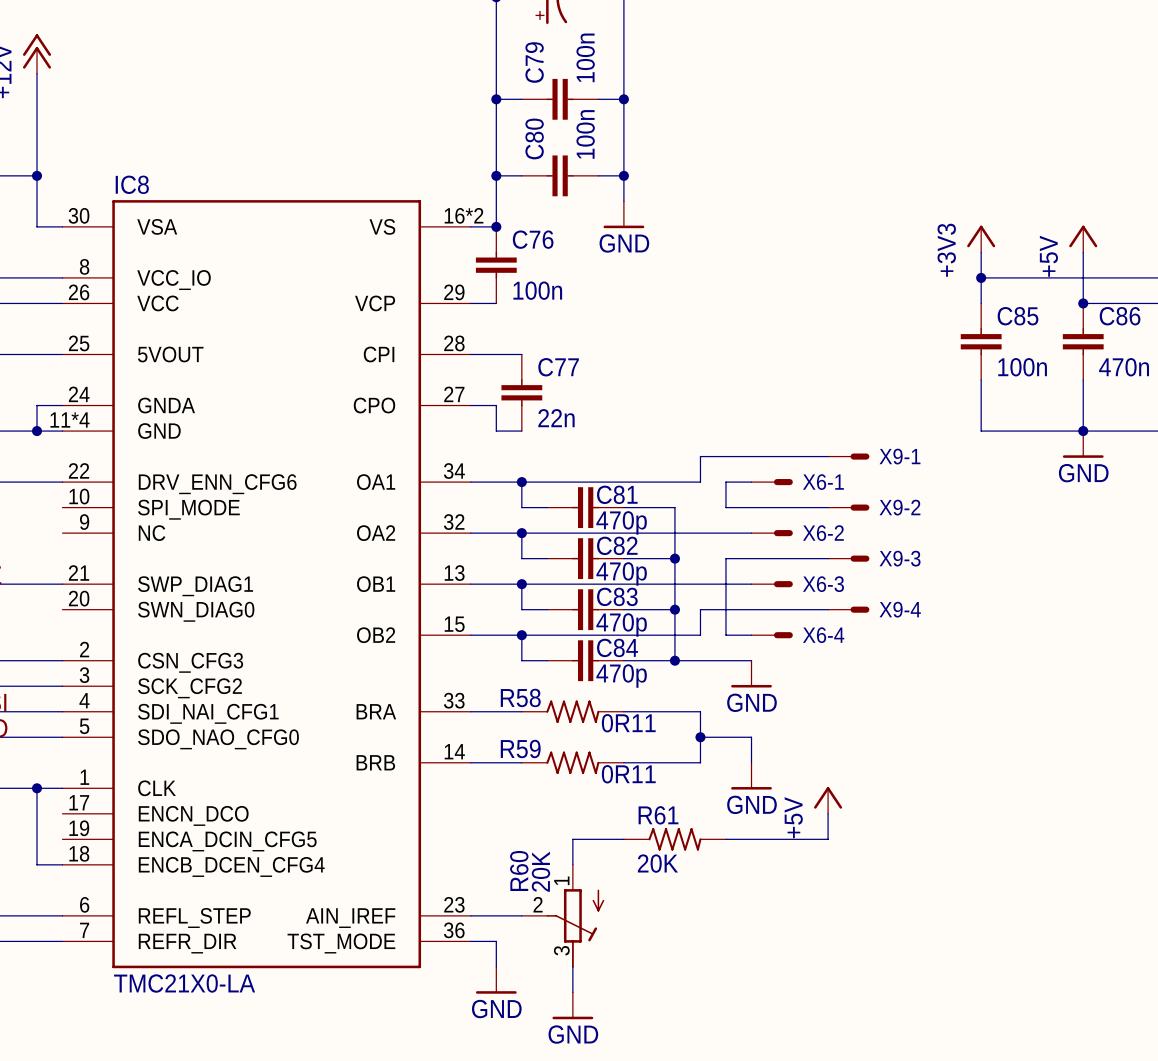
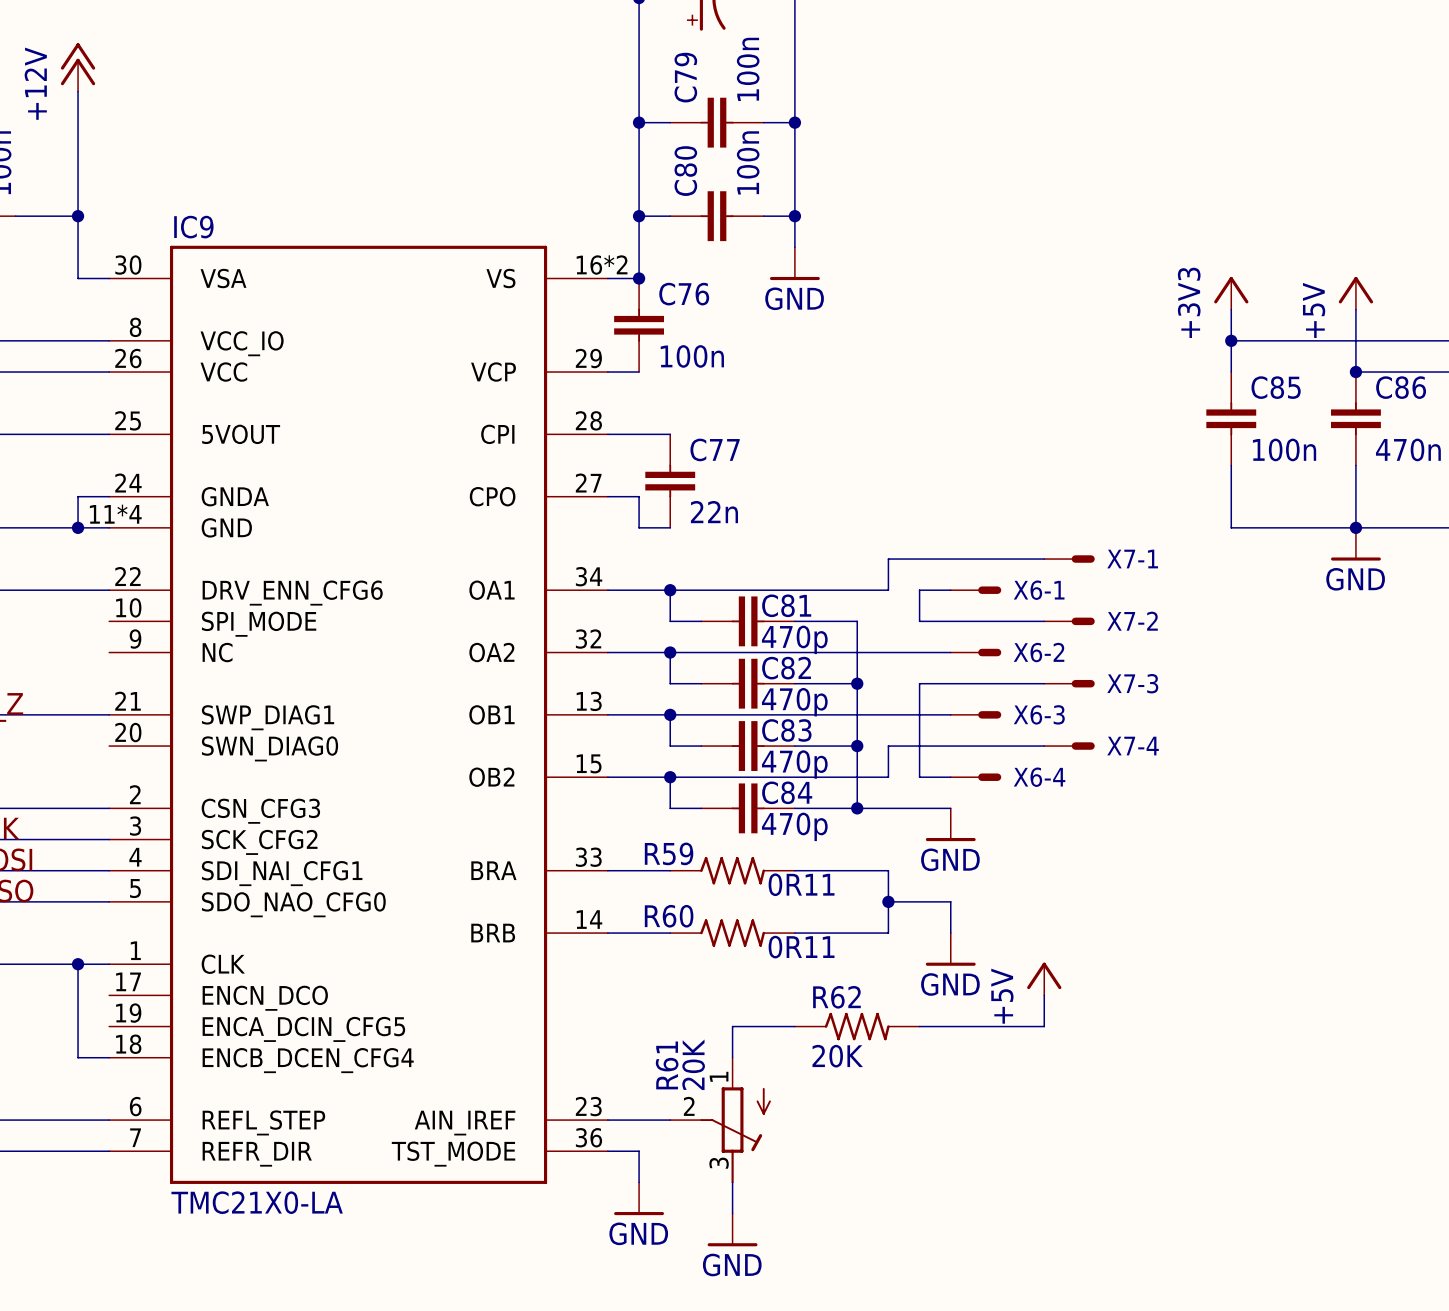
IC8 name: IC8 (132, 184) -> IC9 (193, 227)
X9-1 name: X9-1 (899, 456) -> X7-1 (1132, 559)
X9-2 name: X9-2 (899, 507) -> X7-2 (1132, 621)
X9-3 name: X9-3 (900, 558) -> X7-3 (1132, 683)
X9-4 name: X9-4 (900, 609) -> X7-4 (1133, 746)
R58 name: R58 (520, 697) -> R59 (669, 853)
R59 name: R59 (520, 748) -> R60 (669, 916)
R61 name: R61 (658, 815) -> R62 (836, 997)
R60 name: R60 (519, 870) -> R61 (667, 1065)

